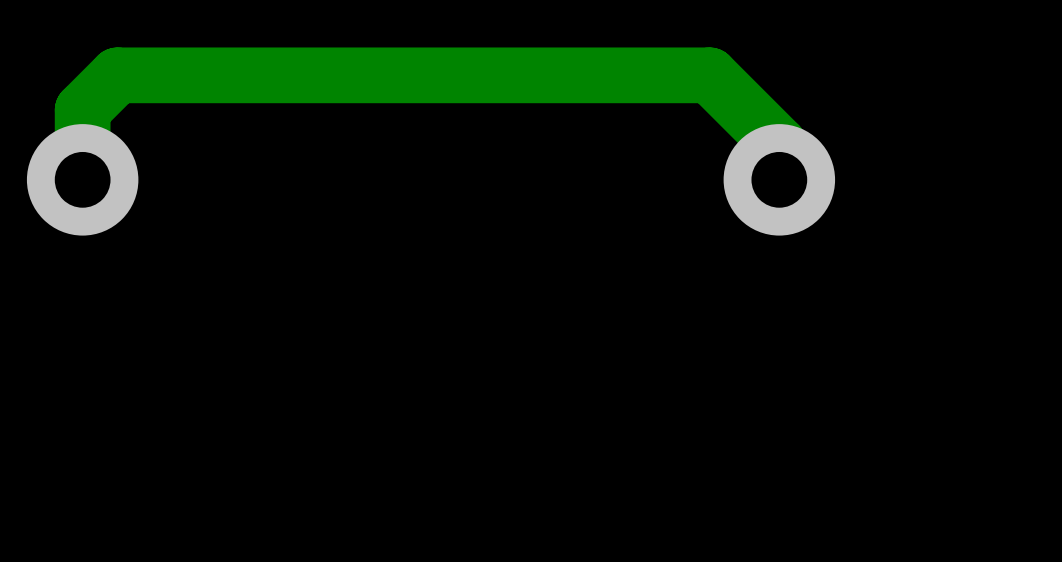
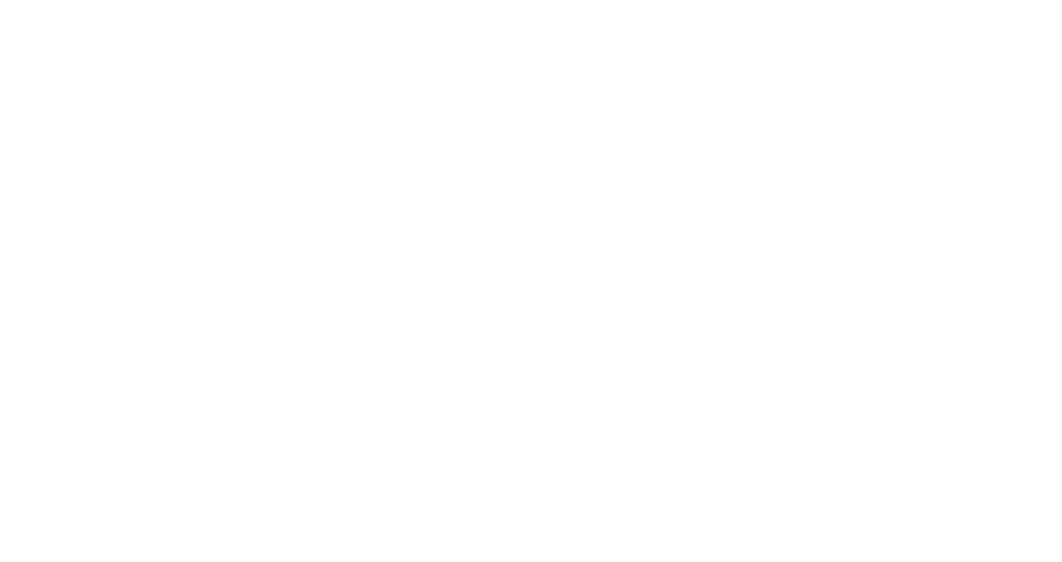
via: (82, 179) -> none
track: (779, 179) (779, 145) (709, 75) (117, 75) (82, 110) (82, 179) -> none
via: (779, 179) -> none

